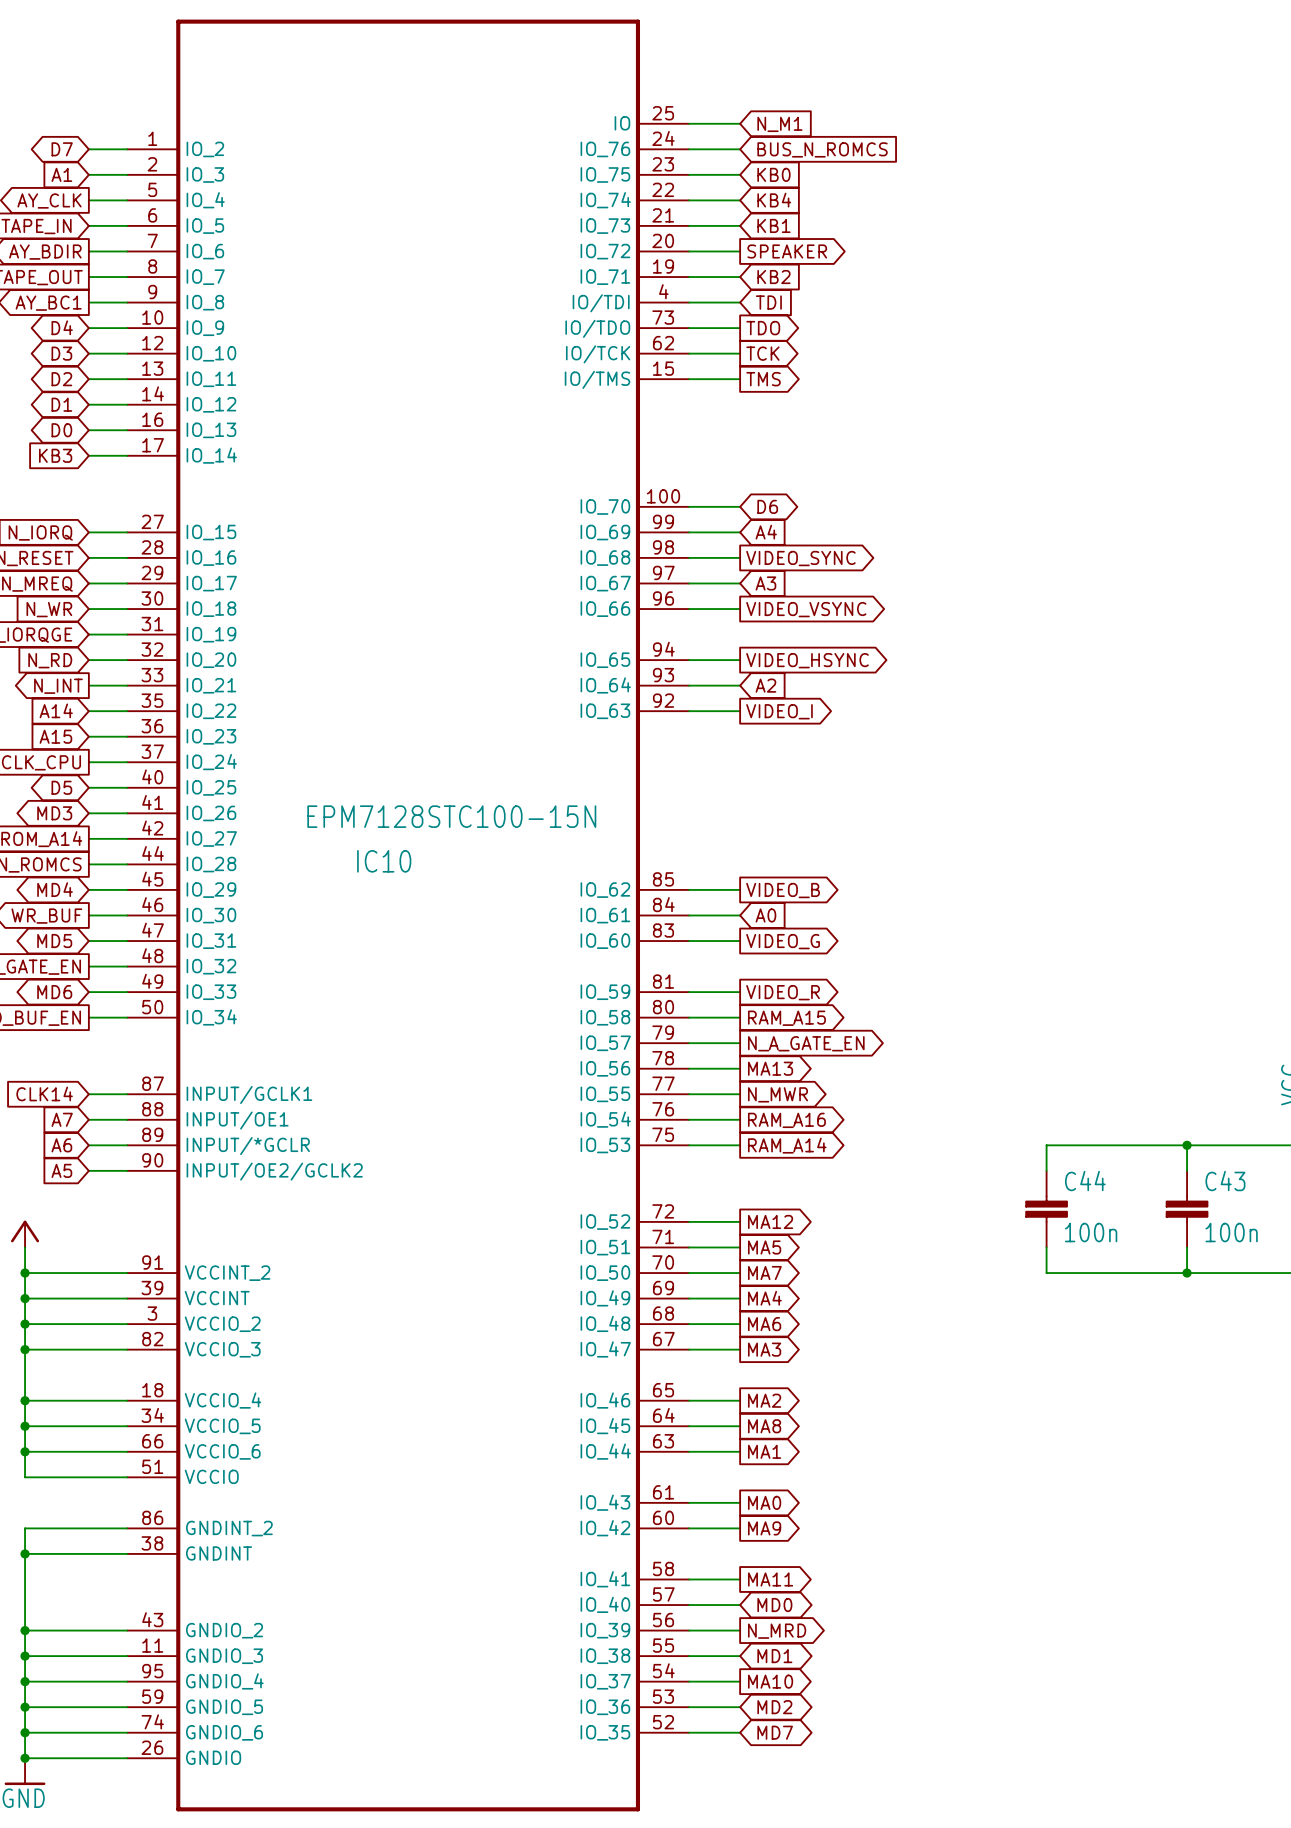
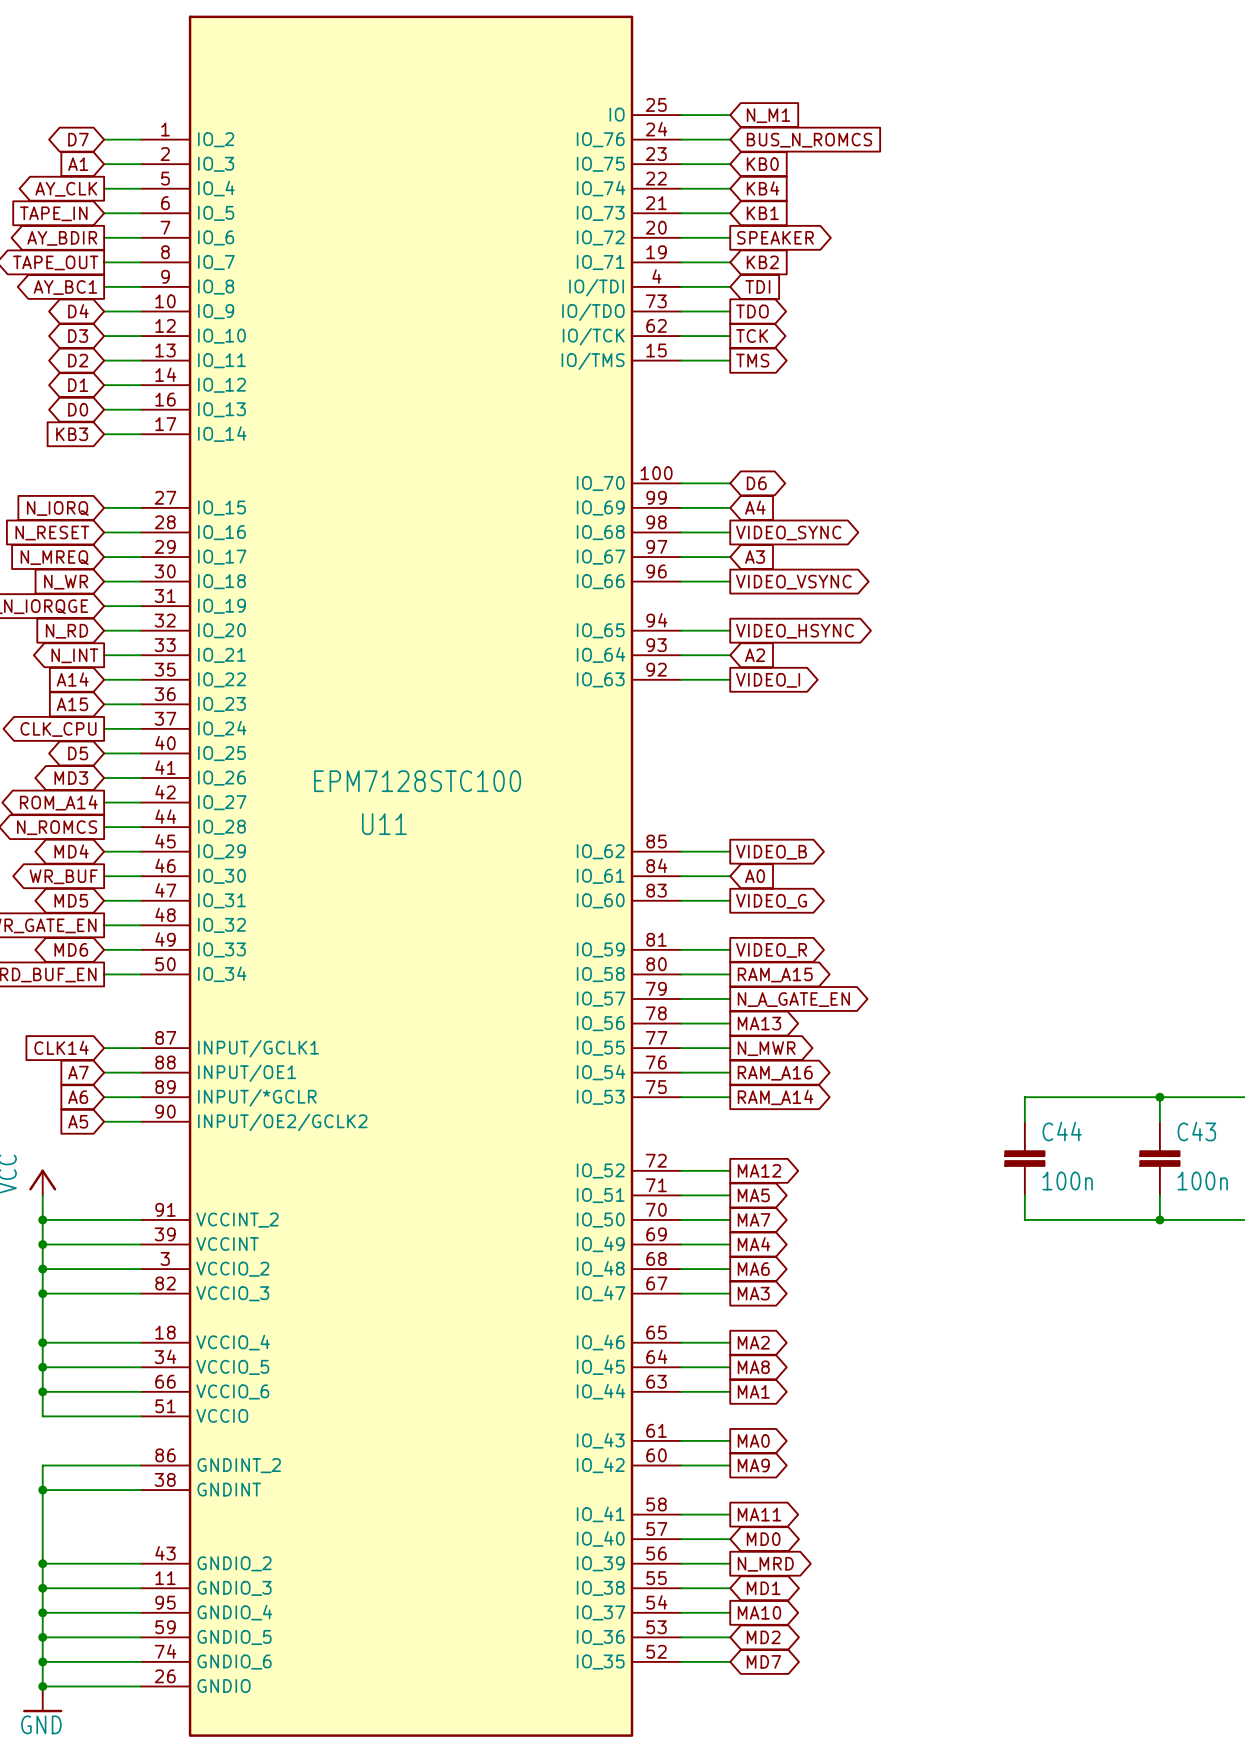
IC10: EPM7128STC100-15N (408, 915) -> none
U11: none -> EPM7128STC100 (411, 876)

